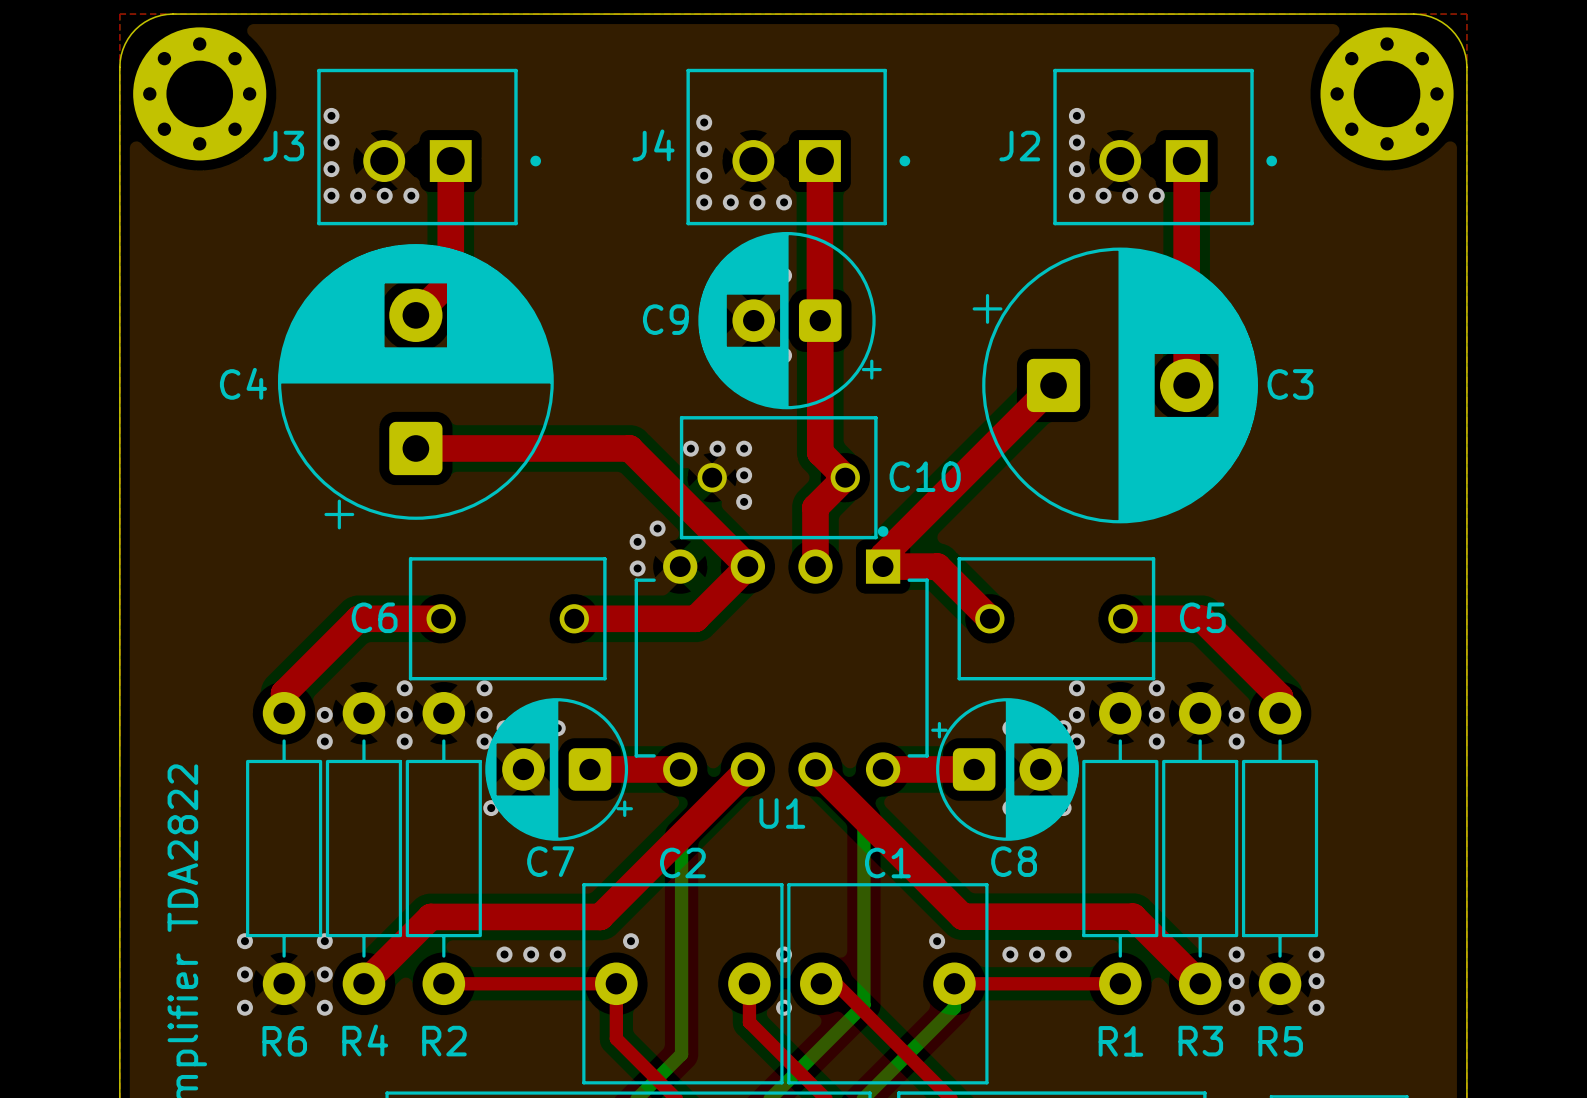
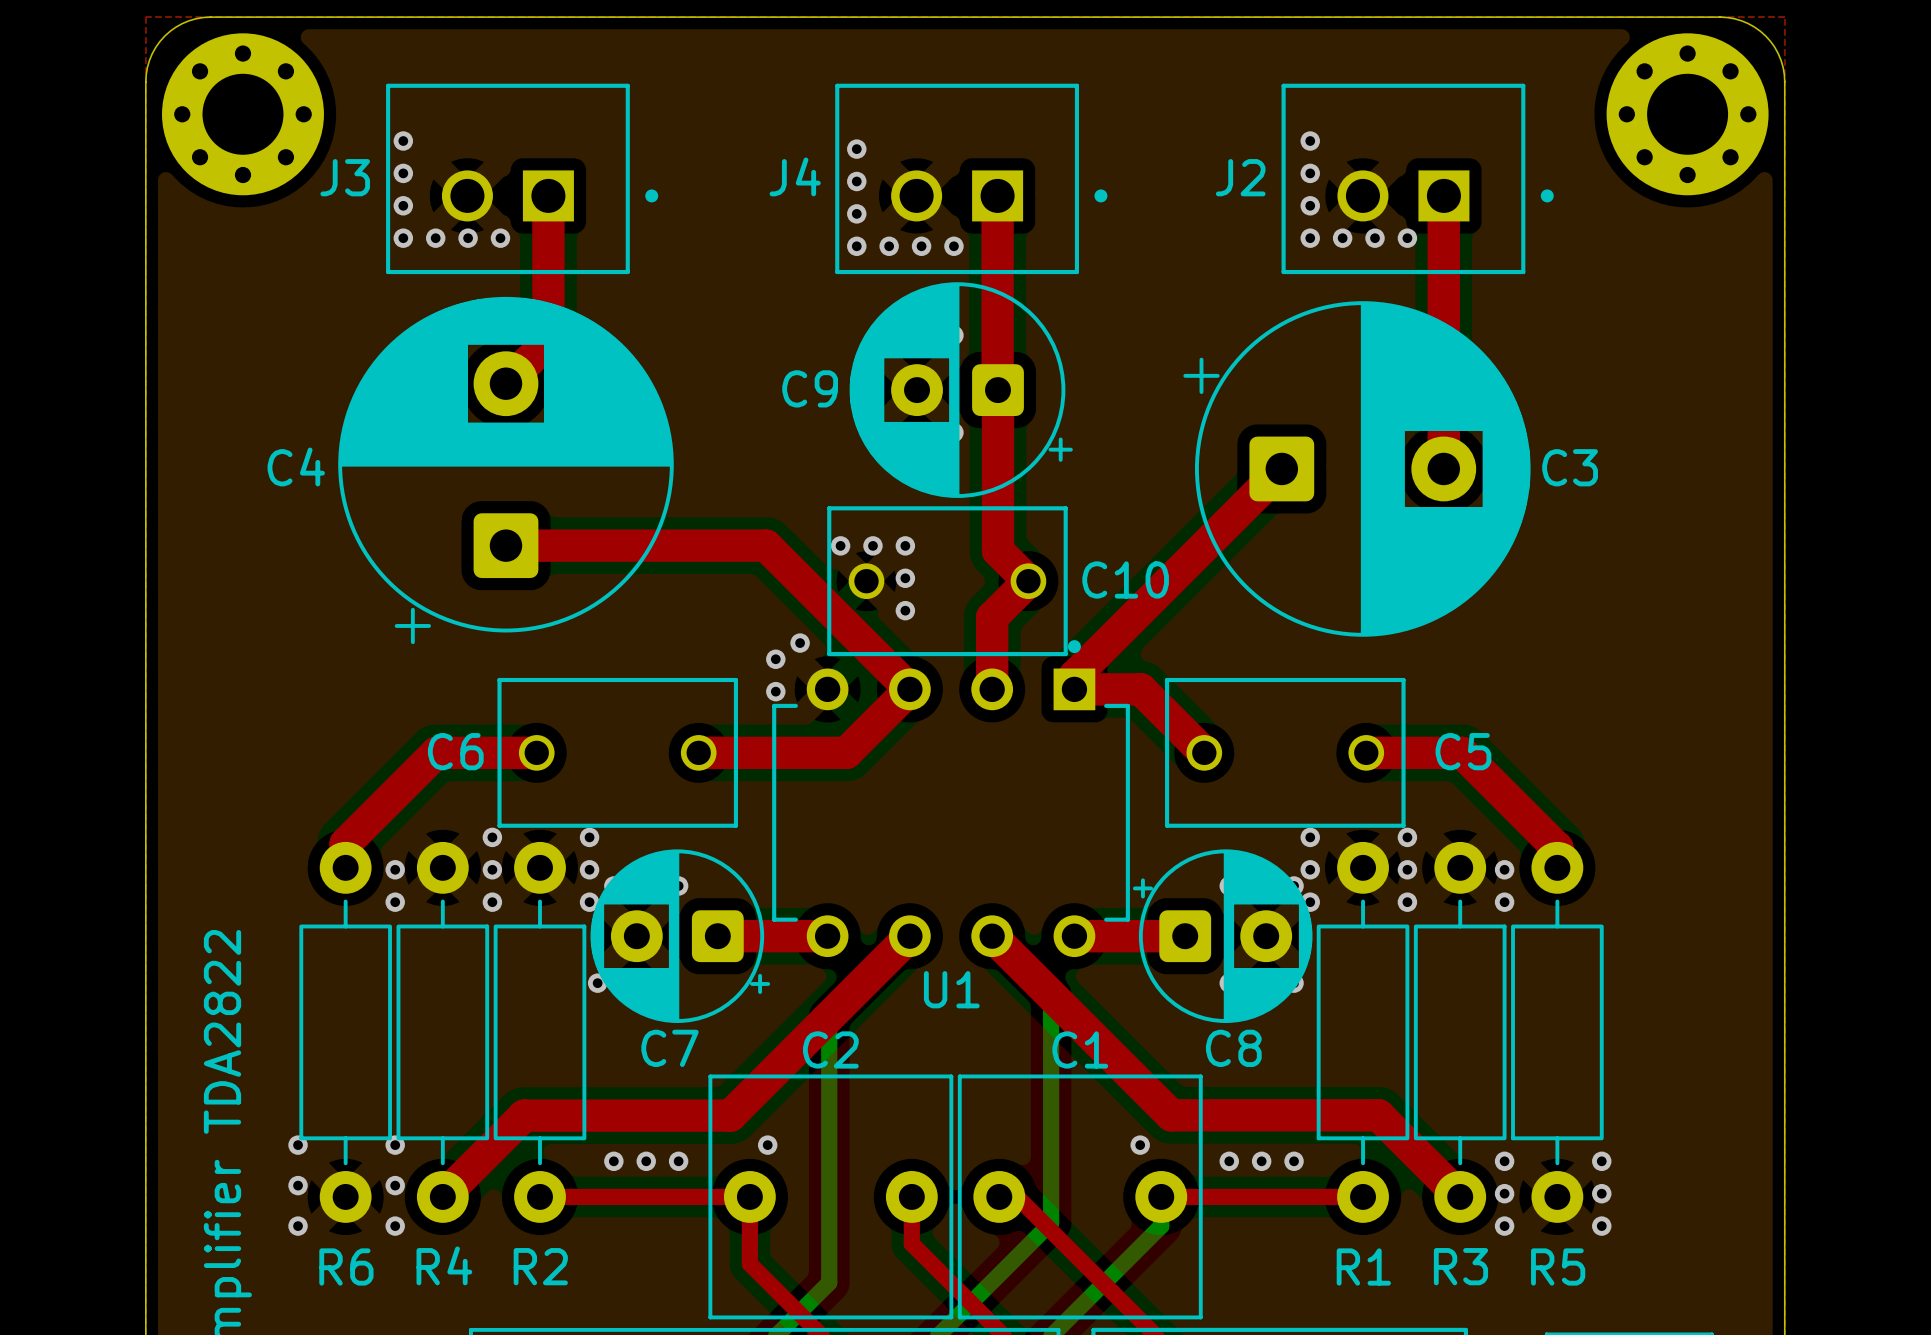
via: (784, 954) -> none
via: (784, 1007) -> none

